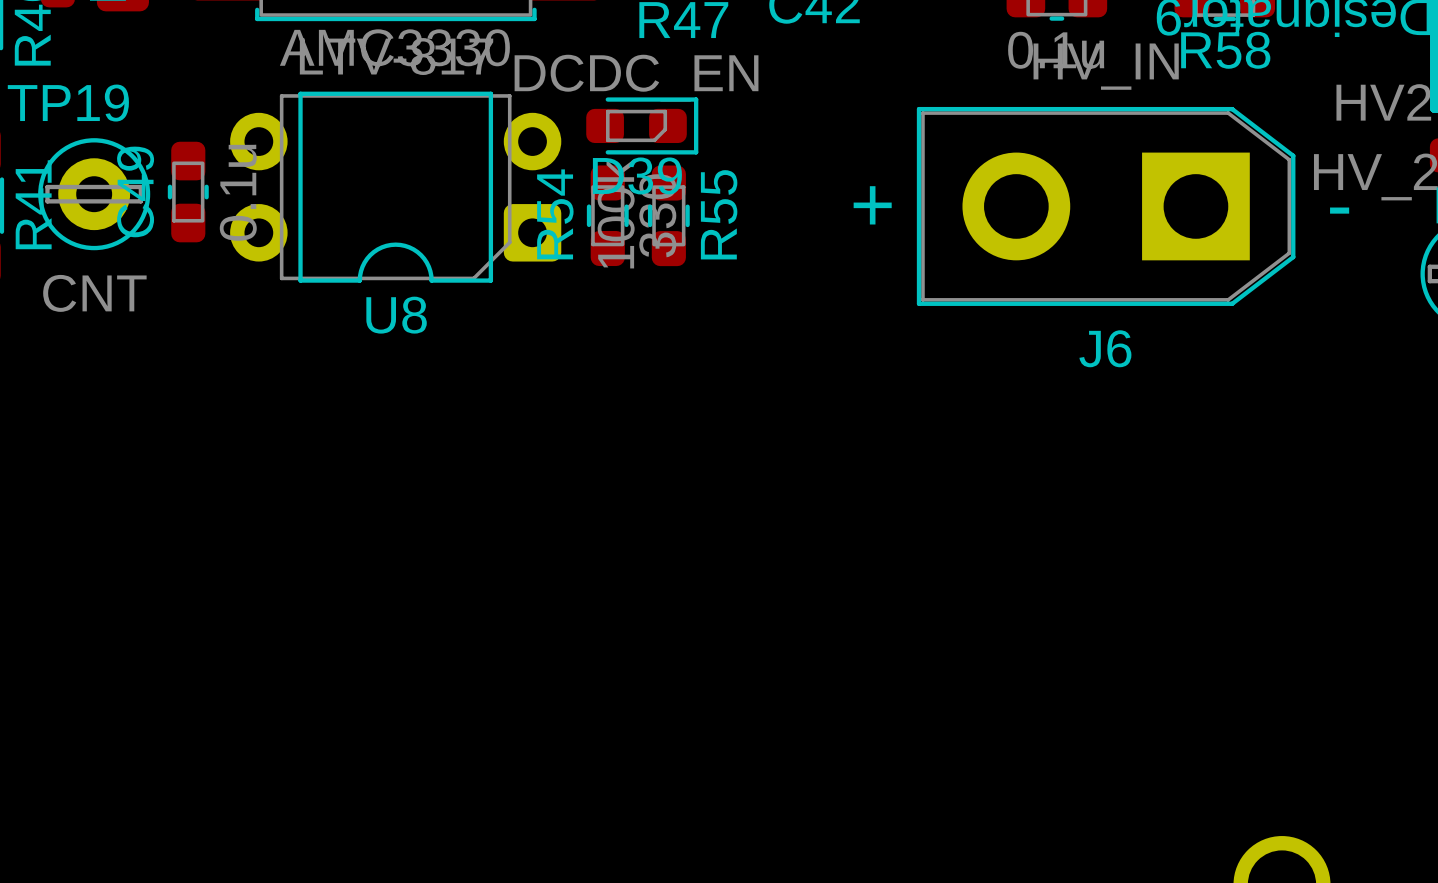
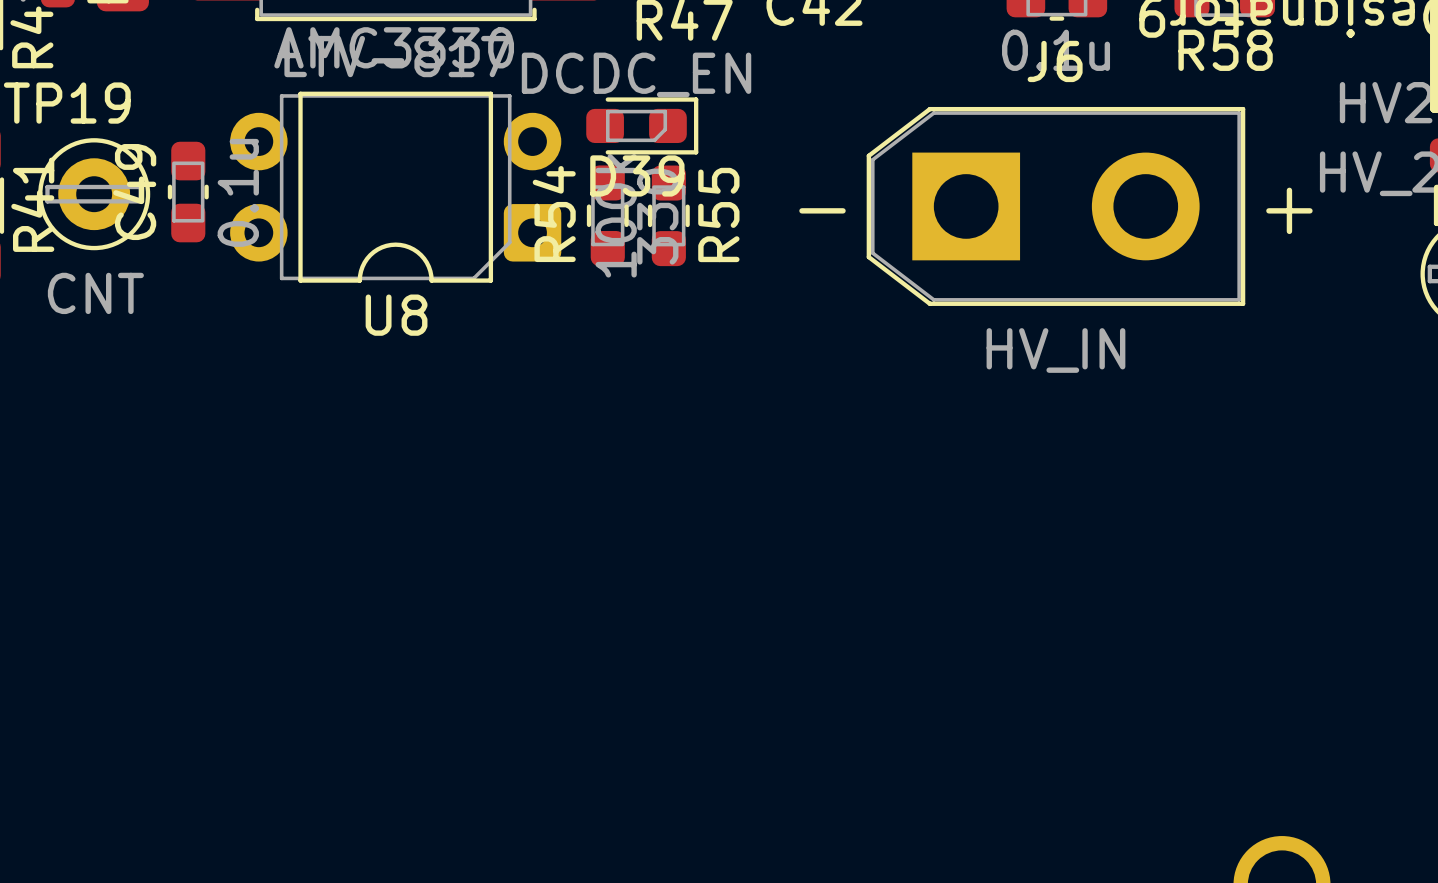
J6 rotation: 0° (1106, 206) -> 180° (1055, 206)

